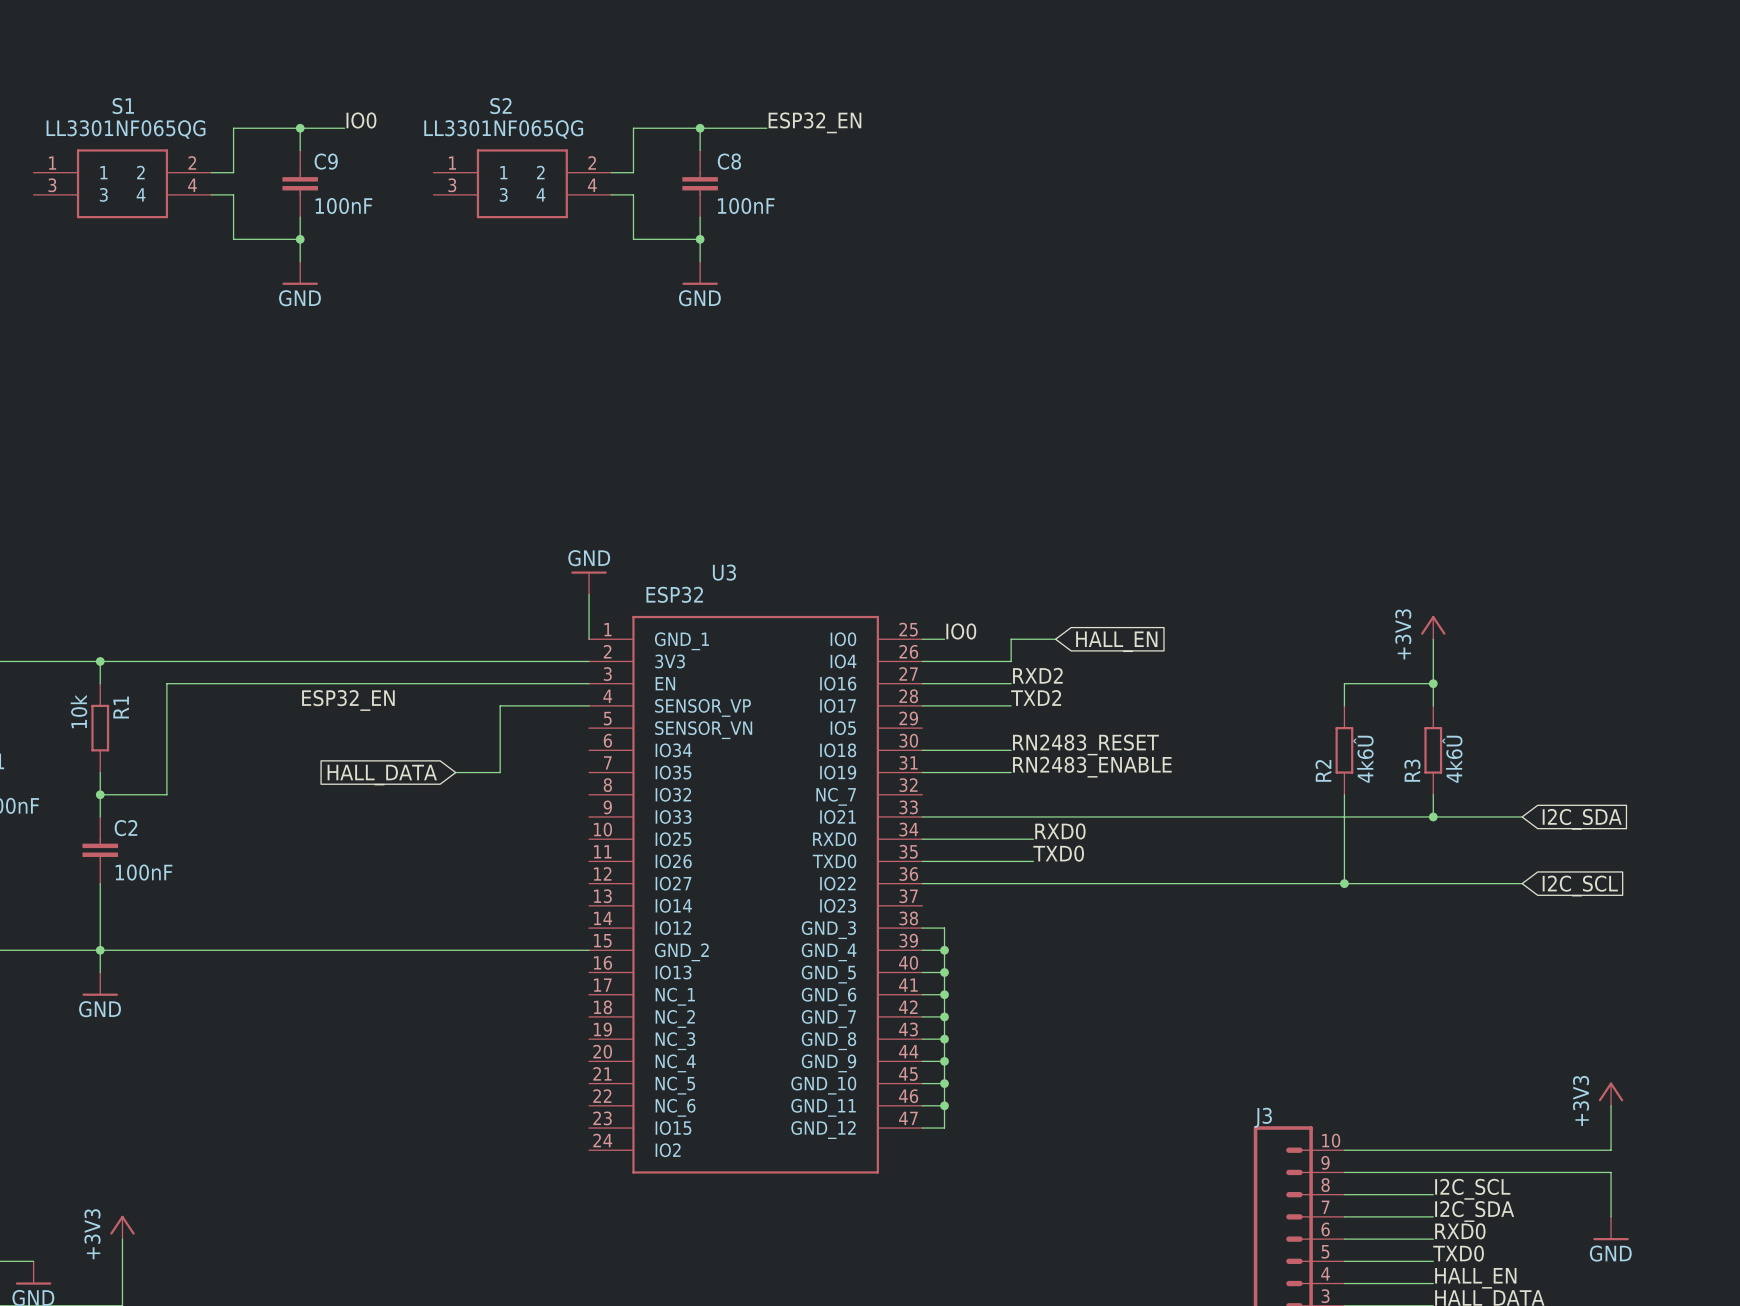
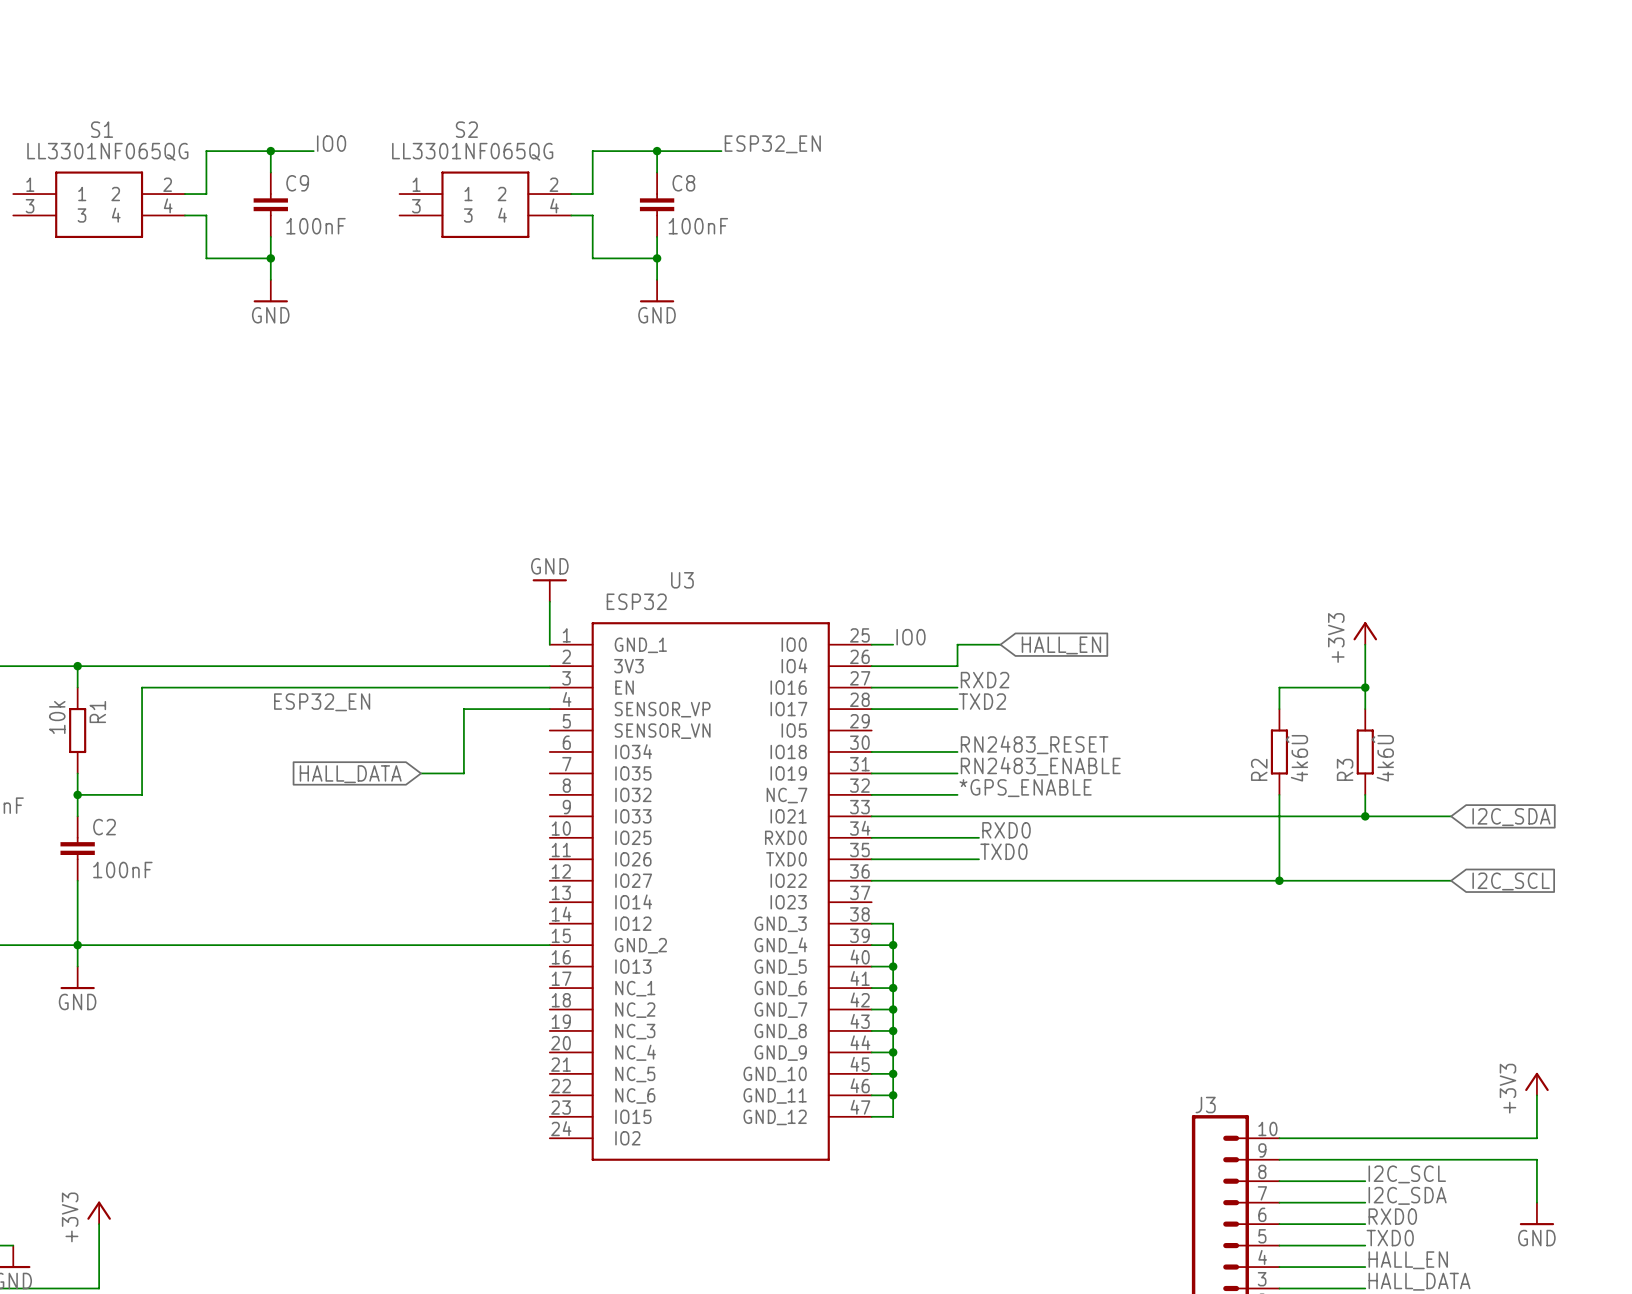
label: none -> *GPS_ENABLE (1025, 788)
wire: none -> (871, 794) (957, 794)

